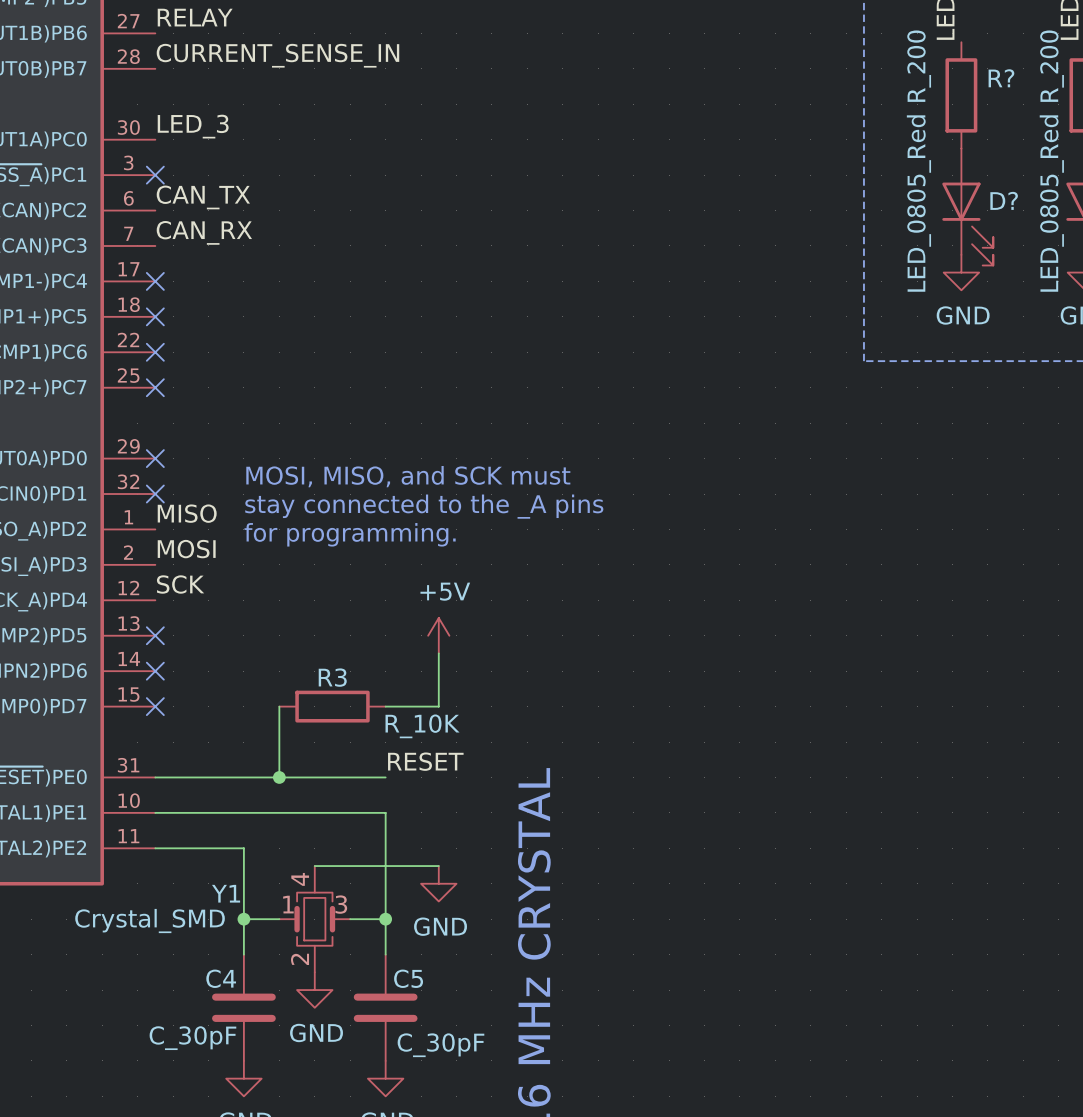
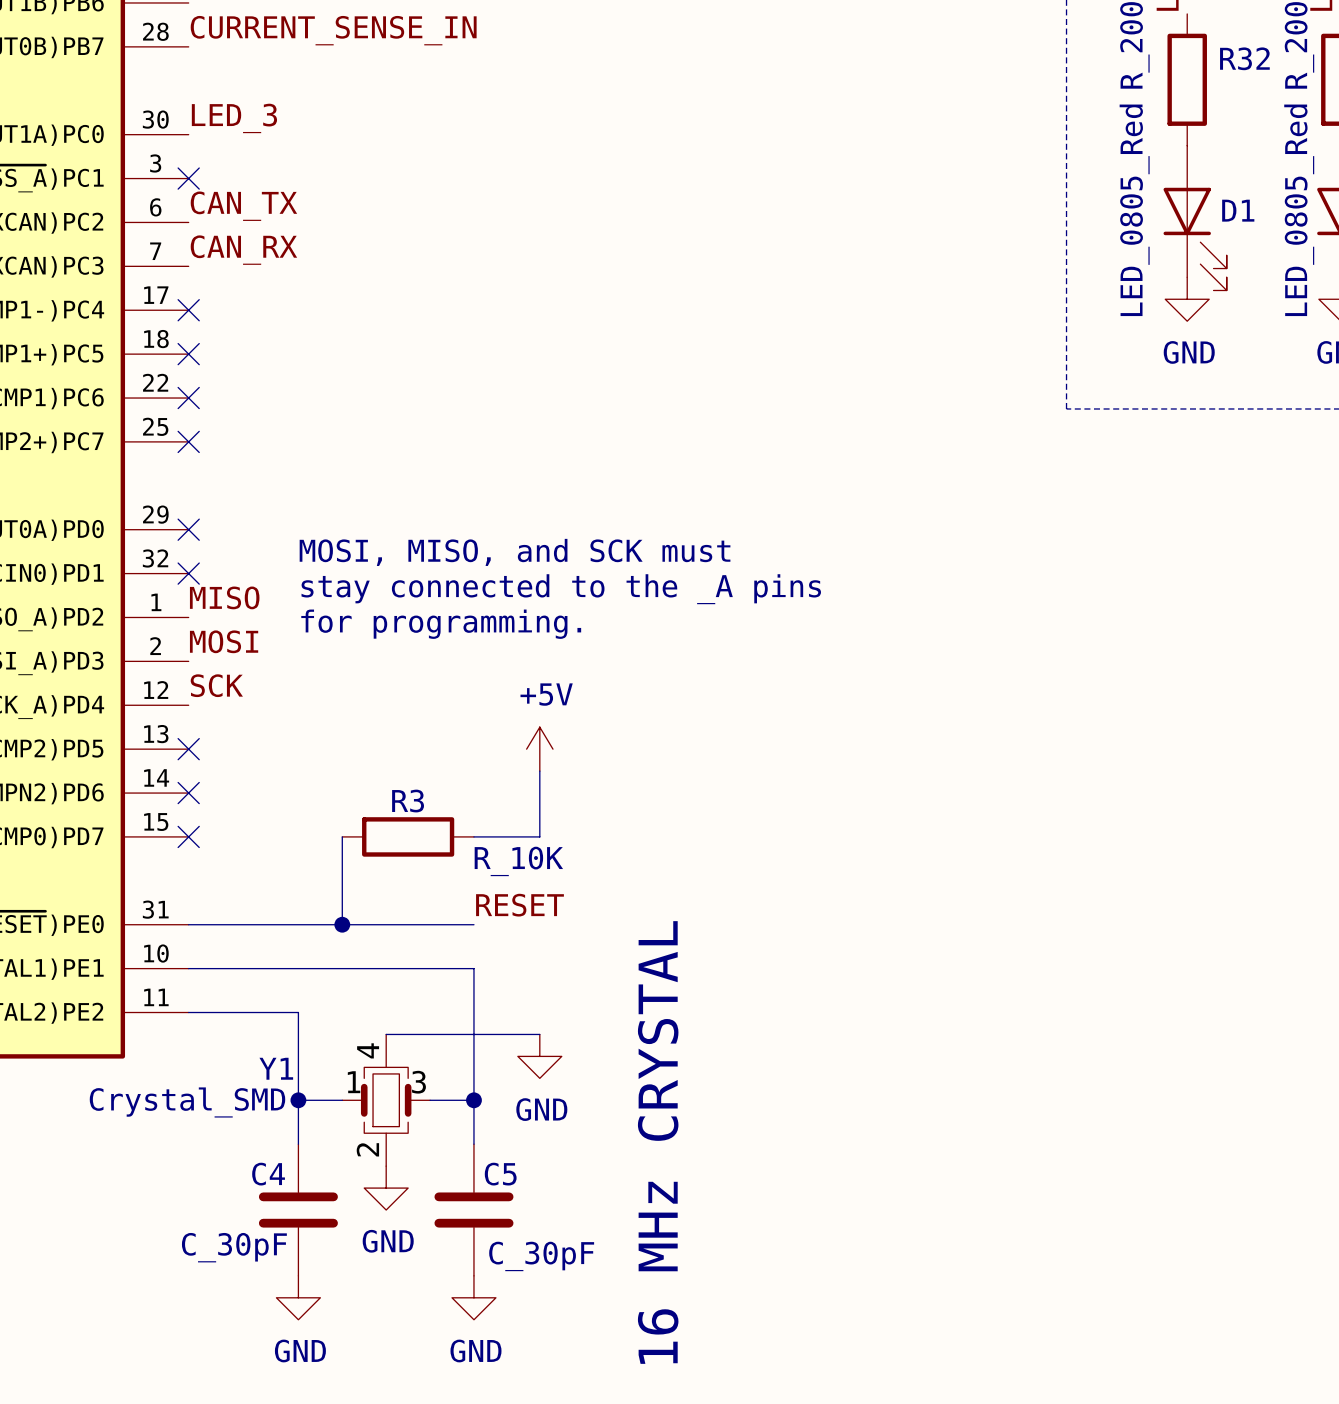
R? name: R? (1001, 78) -> R32 (1244, 58)
D? name: D? (1004, 200) -> D1 (1238, 210)

